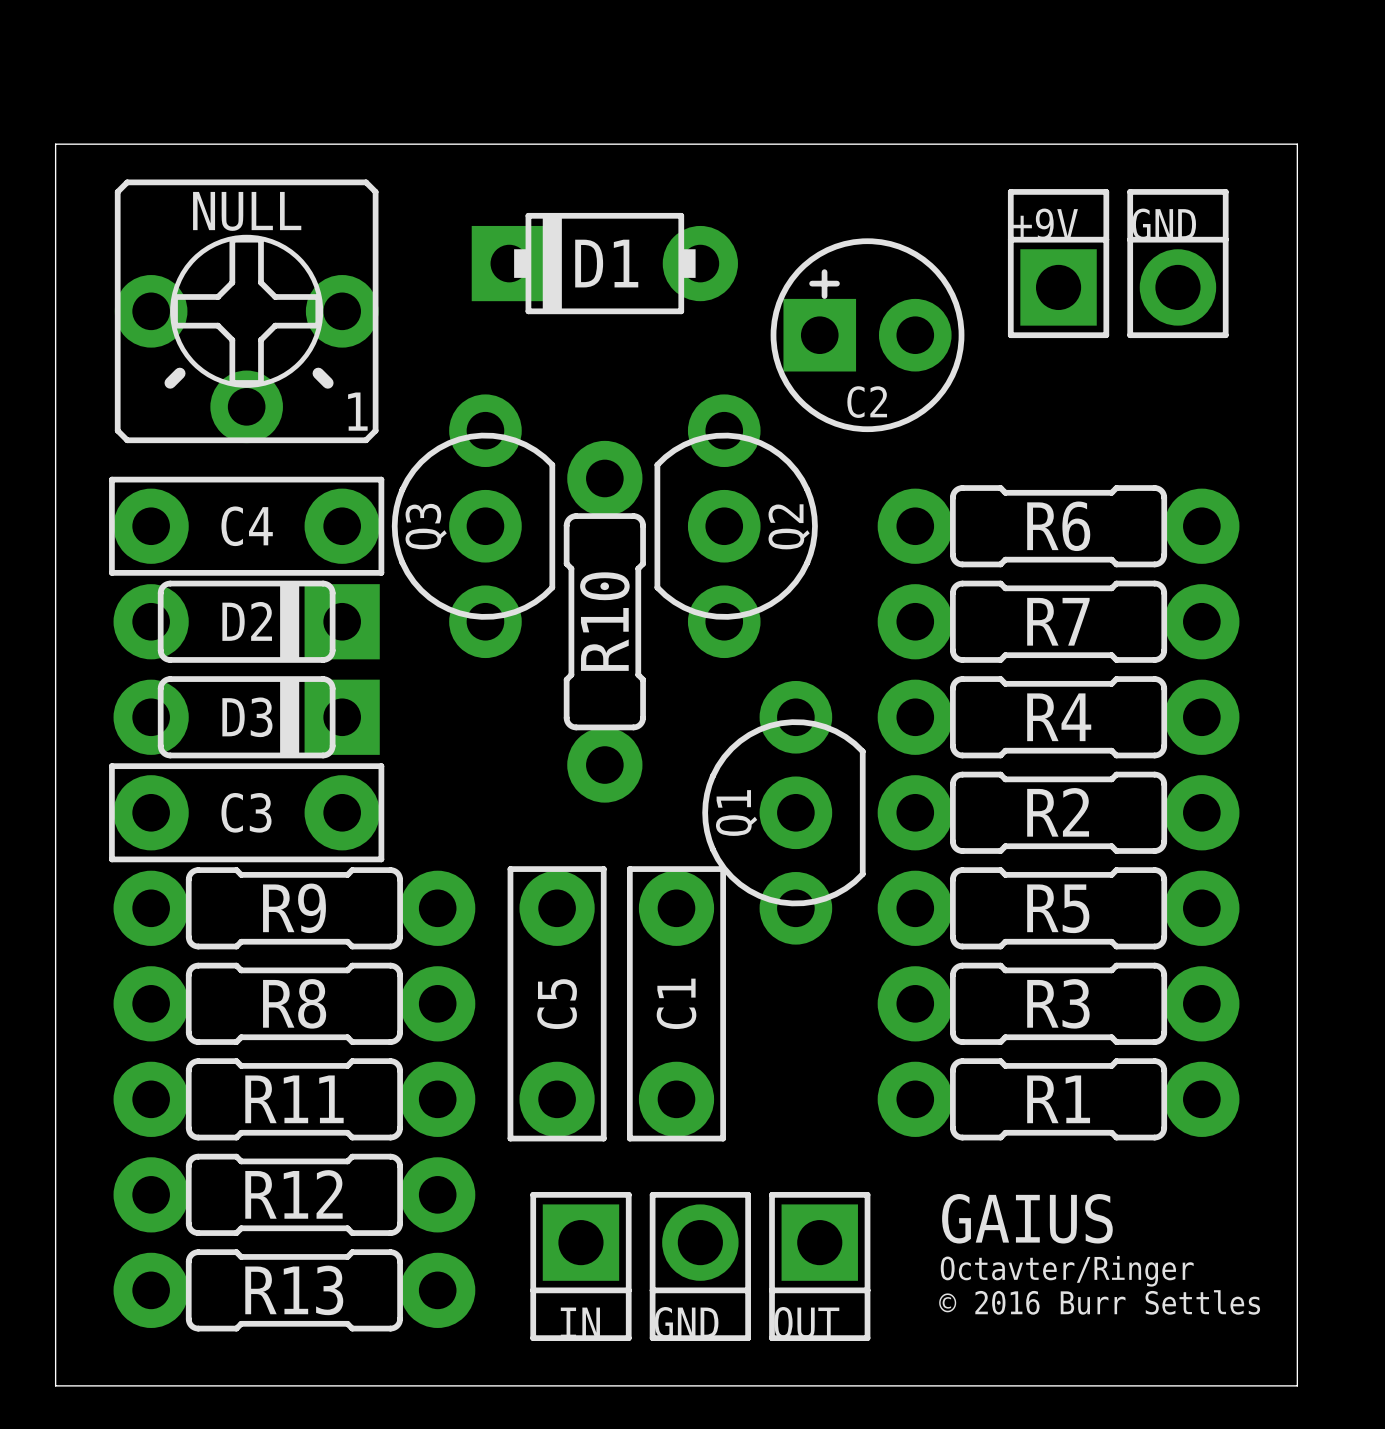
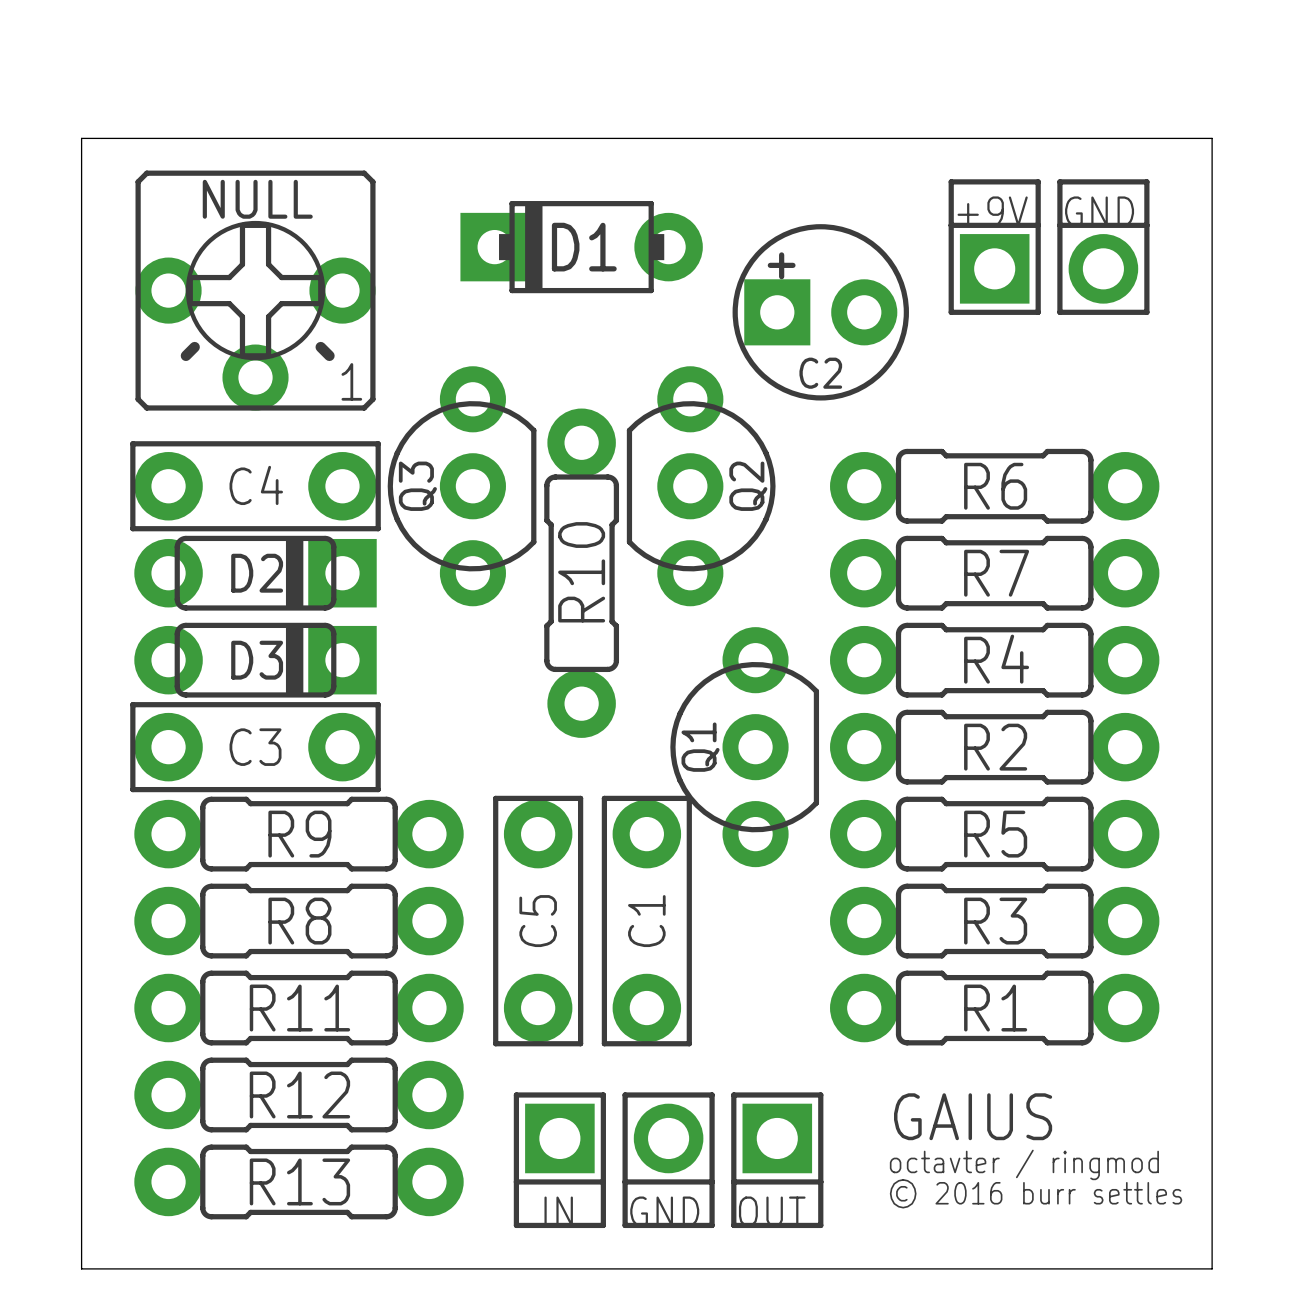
text: Octavter/Ringer (1067, 1271) -> octavter / ringmod (1024, 1164)
text: © 2016 Burr Settles (1099, 1302) -> © 2016 burr settles (1036, 1193)

